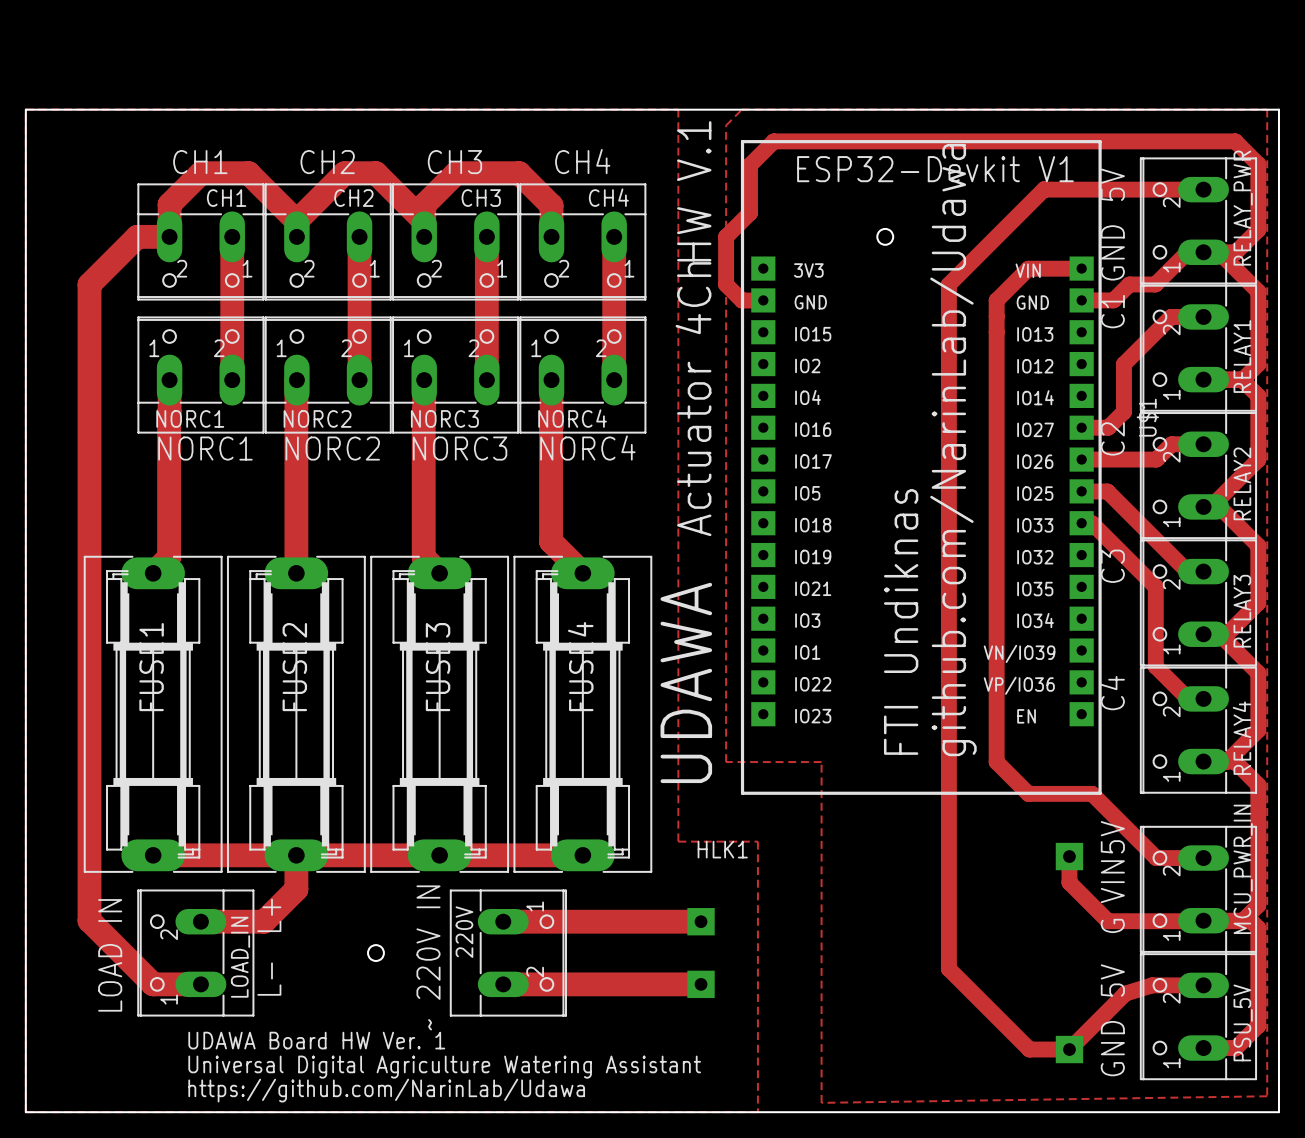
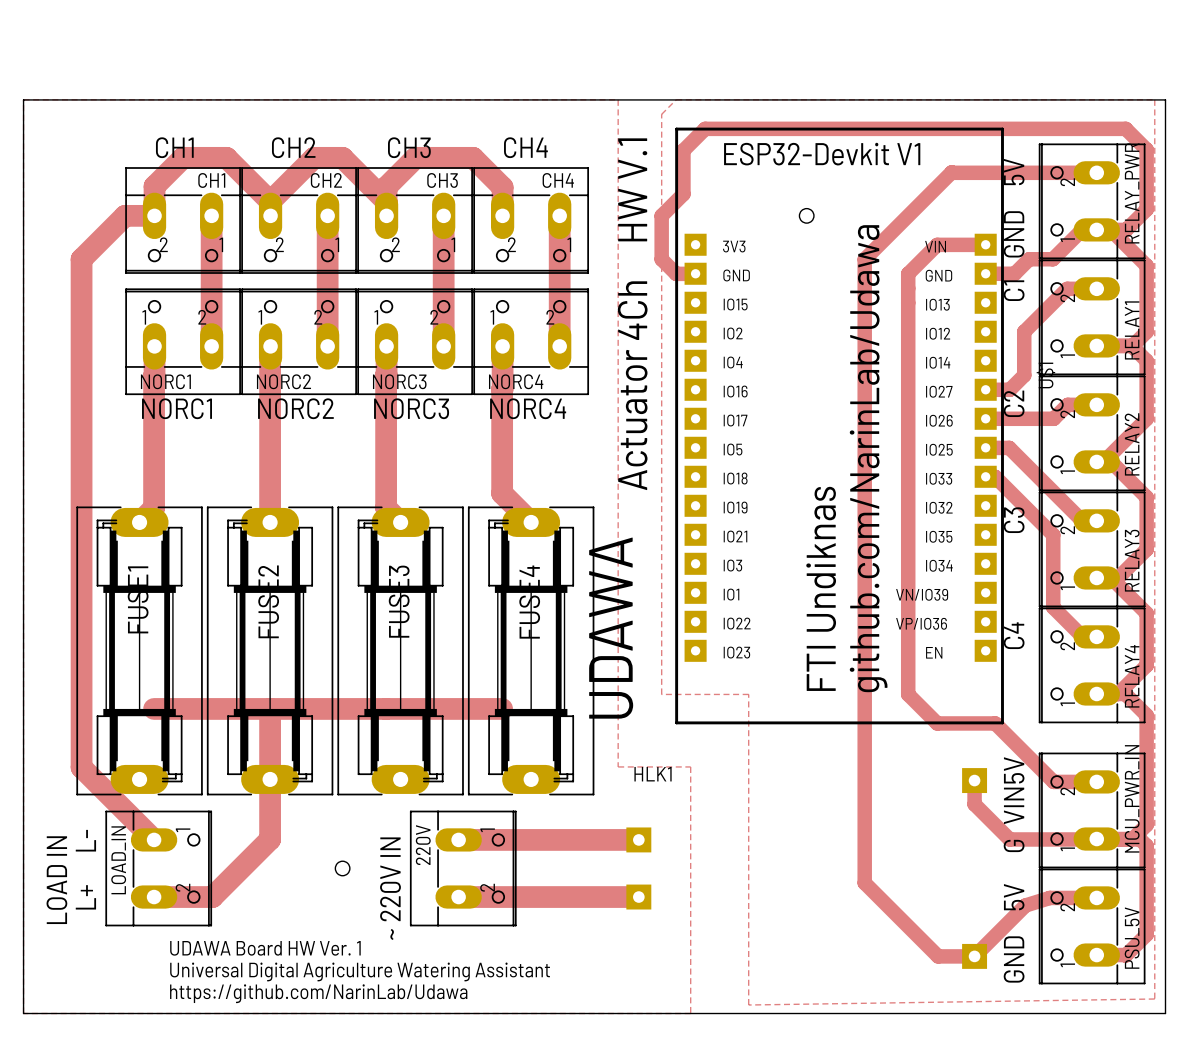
text position: UDAWA (686, 682) -> UDAWA (611, 628)
track: none -> (154, 708) (502, 708)
track: none -> (270, 708) (270, 779)
track: (89, 842) (89, 920) (153, 984) (169, 984) -> (81, 767) (154, 839)
track: (153, 855) (582, 855) -> none
track: (296, 889) (264, 921) (200, 921) -> (270, 810) (270, 839) (212, 897) (183, 897)
text position: L+ (269, 915) -> L+ (85, 897)
LOAD_IN: none -> (158, 868)
LOAD_IN: (195, 953) -> none
text position: LOAD IN (110, 955) -> LOAD IN (56, 880)
text position: L- (269, 979) -> L- (85, 840)

